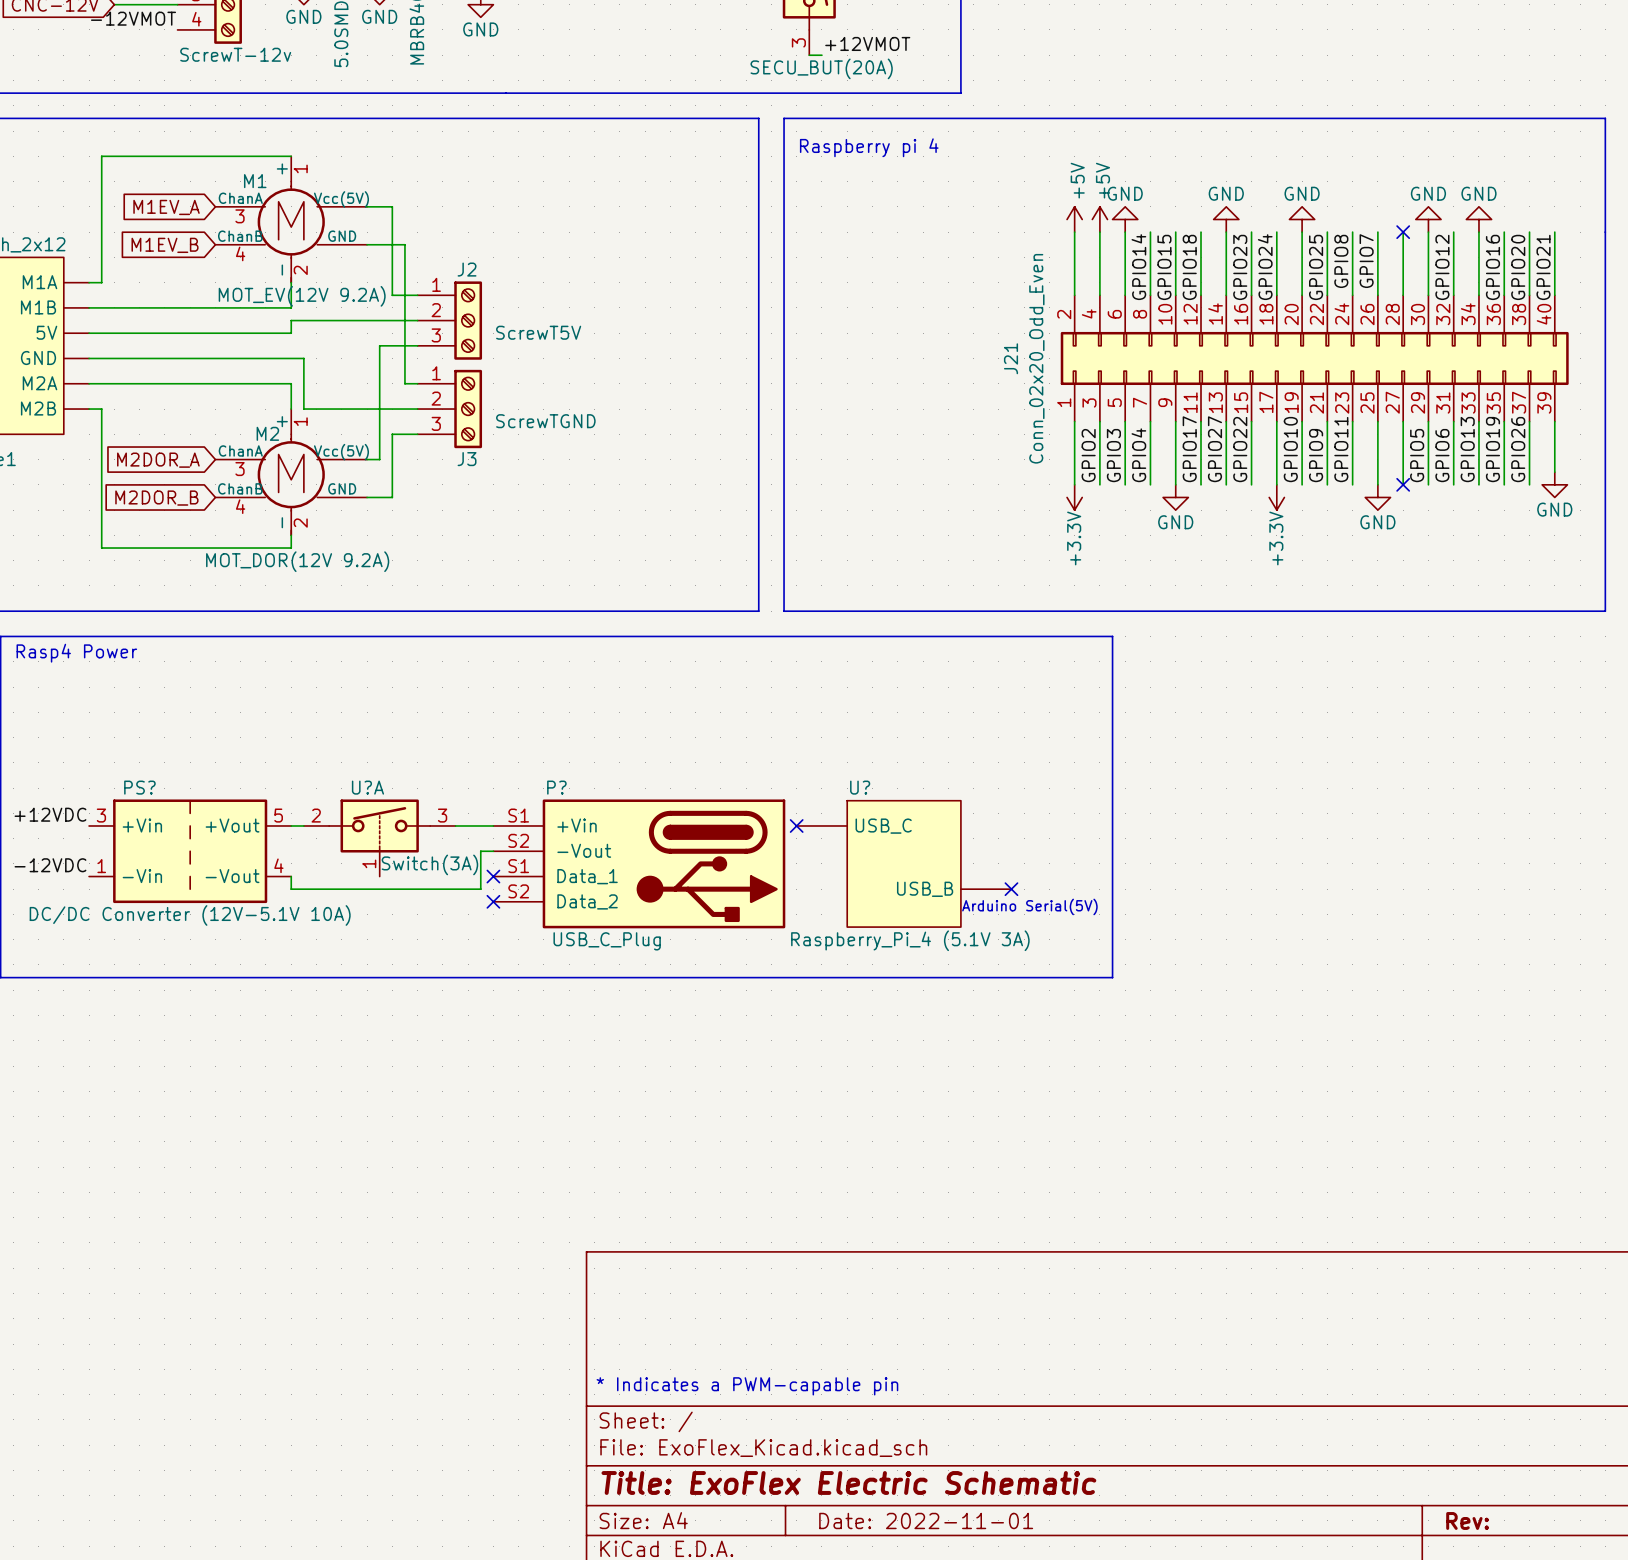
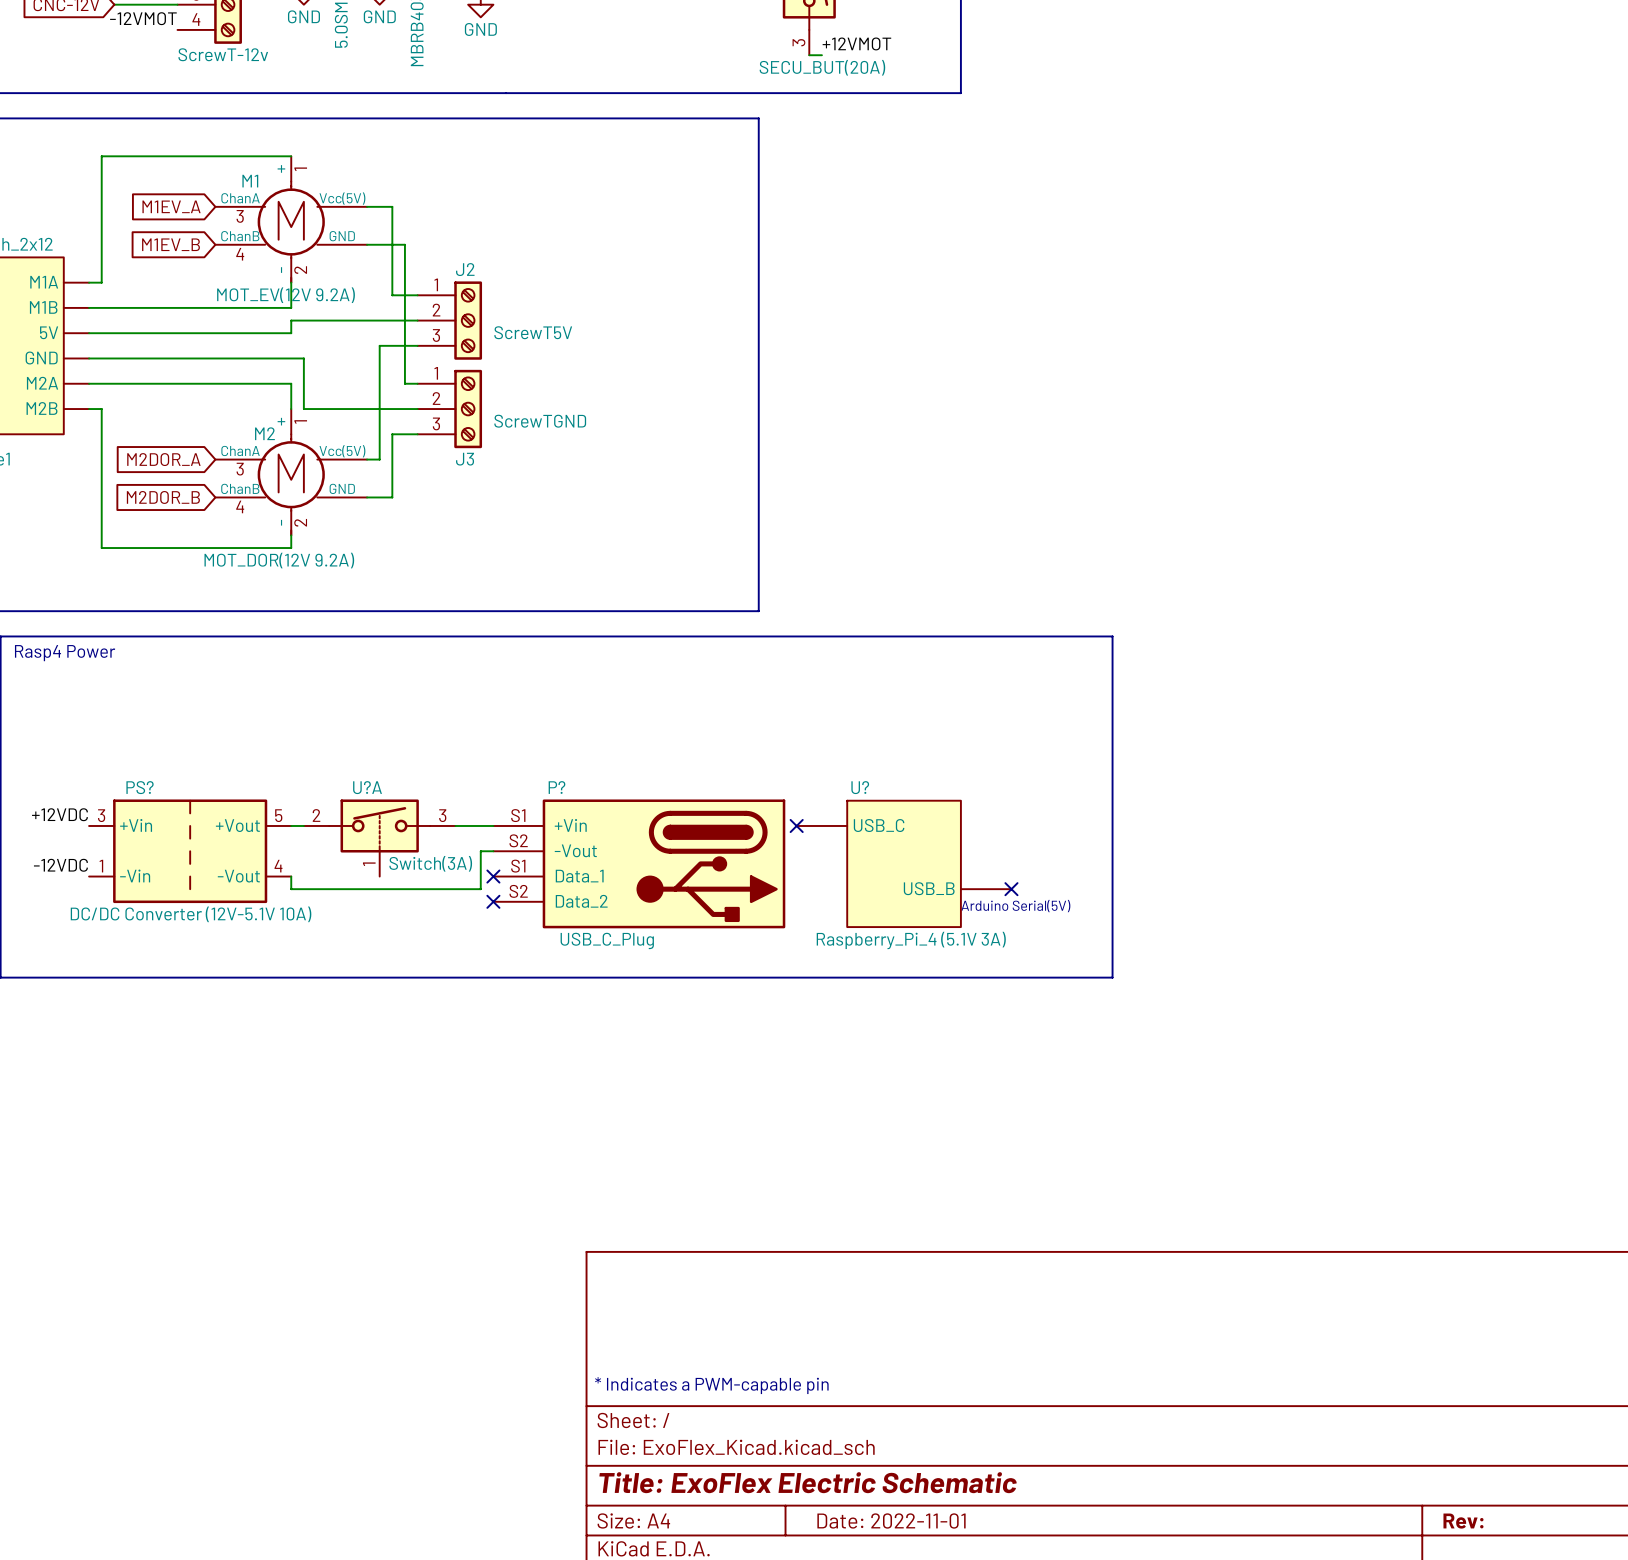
line: (784, 118) (784, 611) (1605, 611) (1605, 118) (784, 118) -> none
text: Raspberry pi 4 (869, 147) -> none
power symbol: +5V (1074, 219) -> none
power symbol: +5V (1099, 219) -> none
power symbol: GND (1125, 219) -> none
power symbol: GND (1226, 219) -> none
power symbol: GND (1302, 219) -> none
power symbol: GND (1428, 219) -> none
power symbol: GND (1478, 219) -> none
wire: (1074, 232) (1074, 295) -> none
wire: (1099, 232) (1099, 295) -> none
wire: (1125, 232) (1125, 295) -> none
wire: (1150, 232) (1150, 295) -> none
wire: (1175, 232) (1175, 295) -> none
wire: (1201, 232) (1201, 295) -> none
wire: (1226, 232) (1226, 295) -> none
wire: (1251, 232) (1251, 295) -> none
wire: (1276, 232) (1276, 295) -> none
wire: (1302, 232) (1302, 295) -> none
wire: (1327, 232) (1327, 295) -> none
wire: (1352, 232) (1352, 295) -> none
wire: (1377, 232) (1377, 295) -> none
wire: (1403, 232) (1403, 295) -> none
no-connect mark: (1403, 232) -> none
wire: (1428, 232) (1428, 295) -> none
wire: (1453, 232) (1453, 295) -> none
wire: (1478, 232) (1478, 295) -> none
wire: (1504, 232) (1504, 295) -> none
wire: (1529, 232) (1529, 295) -> none
wire: (1554, 232) (1554, 295) -> none
label: GPIO8 (1341, 261) -> none
label: GPIO7 (1366, 261) -> none
label: GPIO14 (1138, 267) -> none
label: GPIO15 (1164, 267) -> none
label: GPIO18 (1189, 267) -> none
label: GPIO23 (1240, 267) -> none
label: GPIO24 (1265, 267) -> none
label: GPIO25 (1316, 267) -> none
label: GPIO12 (1442, 267) -> none
label: GPIO16 (1492, 267) -> none
label: GPIO20 (1518, 267) -> none
label: GPIO21 (1543, 267) -> none
J21: Conn_02x20_Odd_Even (1314, 358) -> none
wire: (1074, 421) (1074, 484) -> none
wire: (1099, 421) (1099, 484) -> none
wire: (1125, 421) (1125, 484) -> none
wire: (1150, 421) (1150, 484) -> none
wire: (1175, 421) (1175, 484) -> none
wire: (1201, 421) (1201, 484) -> none
wire: (1226, 421) (1226, 484) -> none
wire: (1251, 421) (1251, 484) -> none
wire: (1276, 421) (1276, 484) -> none
wire: (1302, 421) (1302, 484) -> none
wire: (1327, 421) (1327, 484) -> none
wire: (1352, 421) (1352, 484) -> none
wire: (1377, 421) (1377, 484) -> none
wire: (1403, 421) (1403, 484) -> none
wire: (1428, 421) (1428, 484) -> none
wire: (1453, 421) (1453, 484) -> none
wire: (1478, 421) (1478, 484) -> none
wire: (1504, 421) (1504, 484) -> none
wire: (1529, 421) (1529, 484) -> none
wire: (1554, 421) (1554, 472) -> none
label: GPIO17 (1189, 449) -> none
label: GPIO27 (1214, 449) -> none
label: GPIO22 (1240, 449) -> none
label: GPIO10 (1290, 449) -> none
label: GPIO11 (1341, 449) -> none
label: GPIO13 (1467, 449) -> none
label: GPIO19 (1492, 449) -> none
label: GPIO26 (1518, 449) -> none
label: GPIO2 (1088, 455) -> none
label: GPIO3 (1113, 455) -> none
label: GPIO4 (1138, 455) -> none
label: GPIO9 (1316, 455) -> none
label: GPIO5 (1417, 455) -> none
label: GPIO6 (1442, 455) -> none
no-connect mark: (1403, 484) -> none
power symbol: GND (1554, 484) -> none
power symbol: +3.3V (1074, 497) -> none
power symbol: GND (1175, 497) -> none
power symbol: +3.3V (1276, 497) -> none
power symbol: GND (1377, 497) -> none

